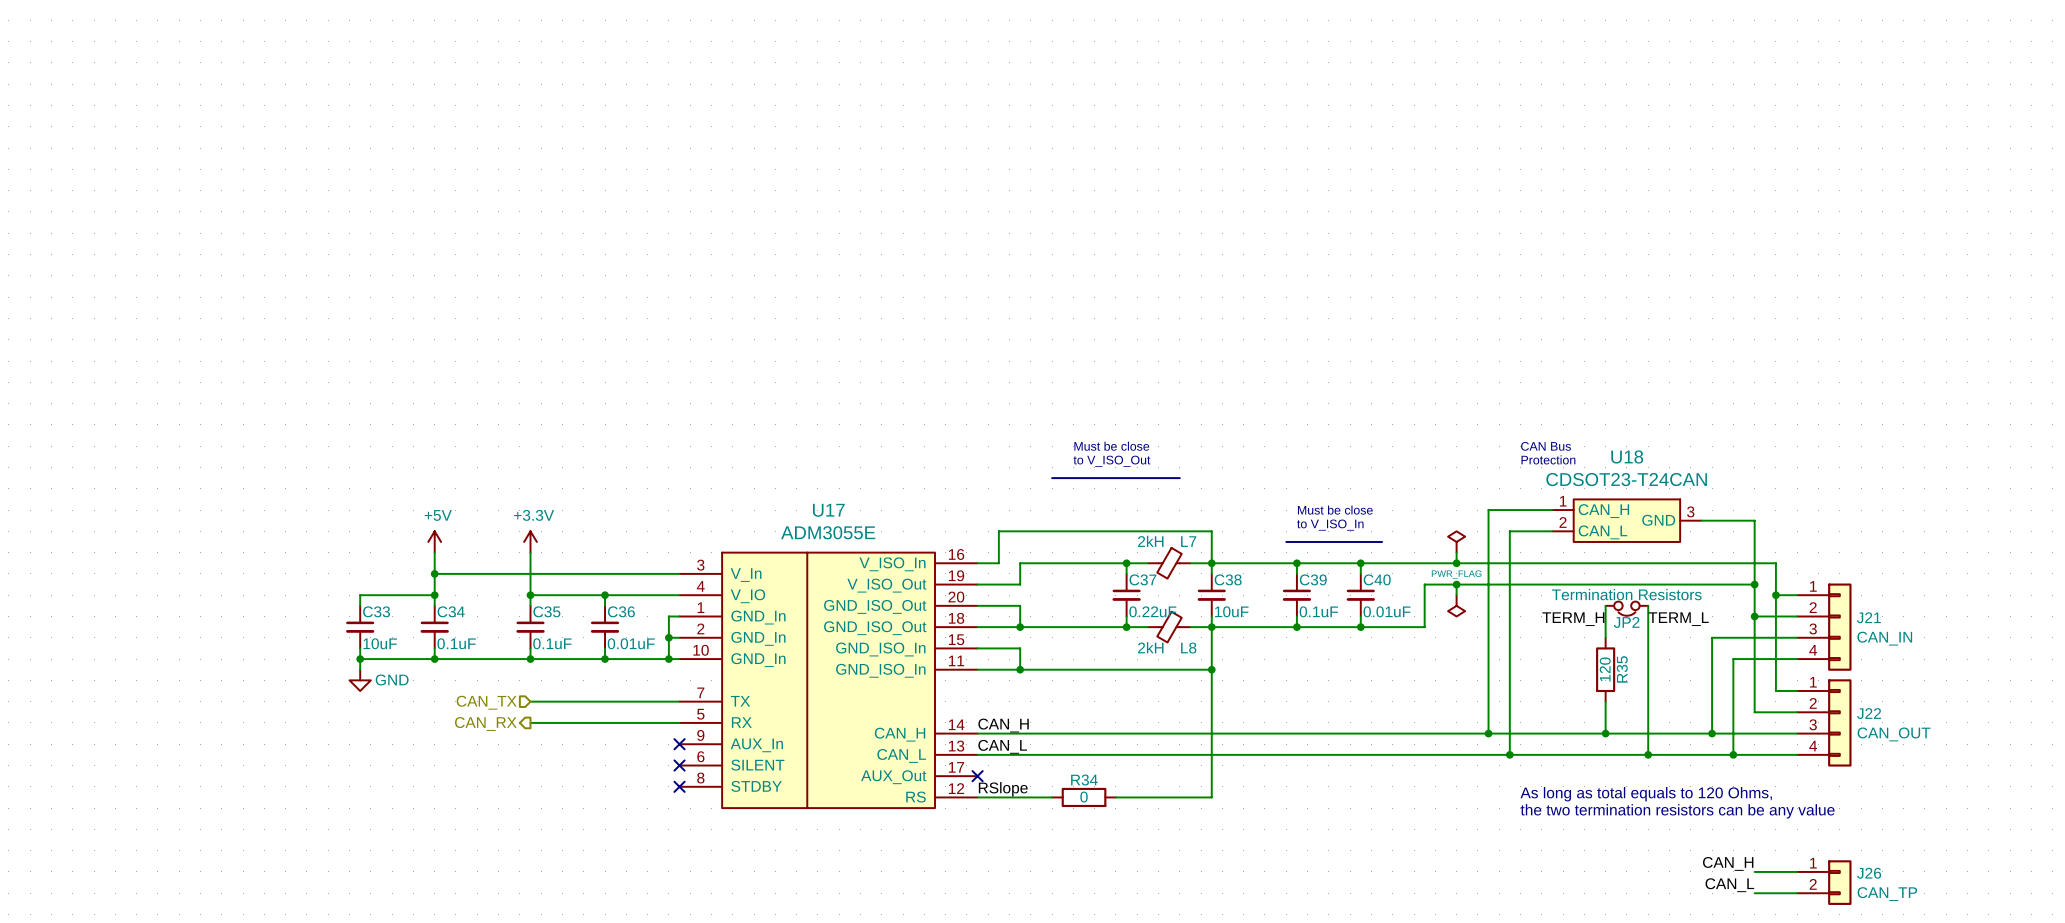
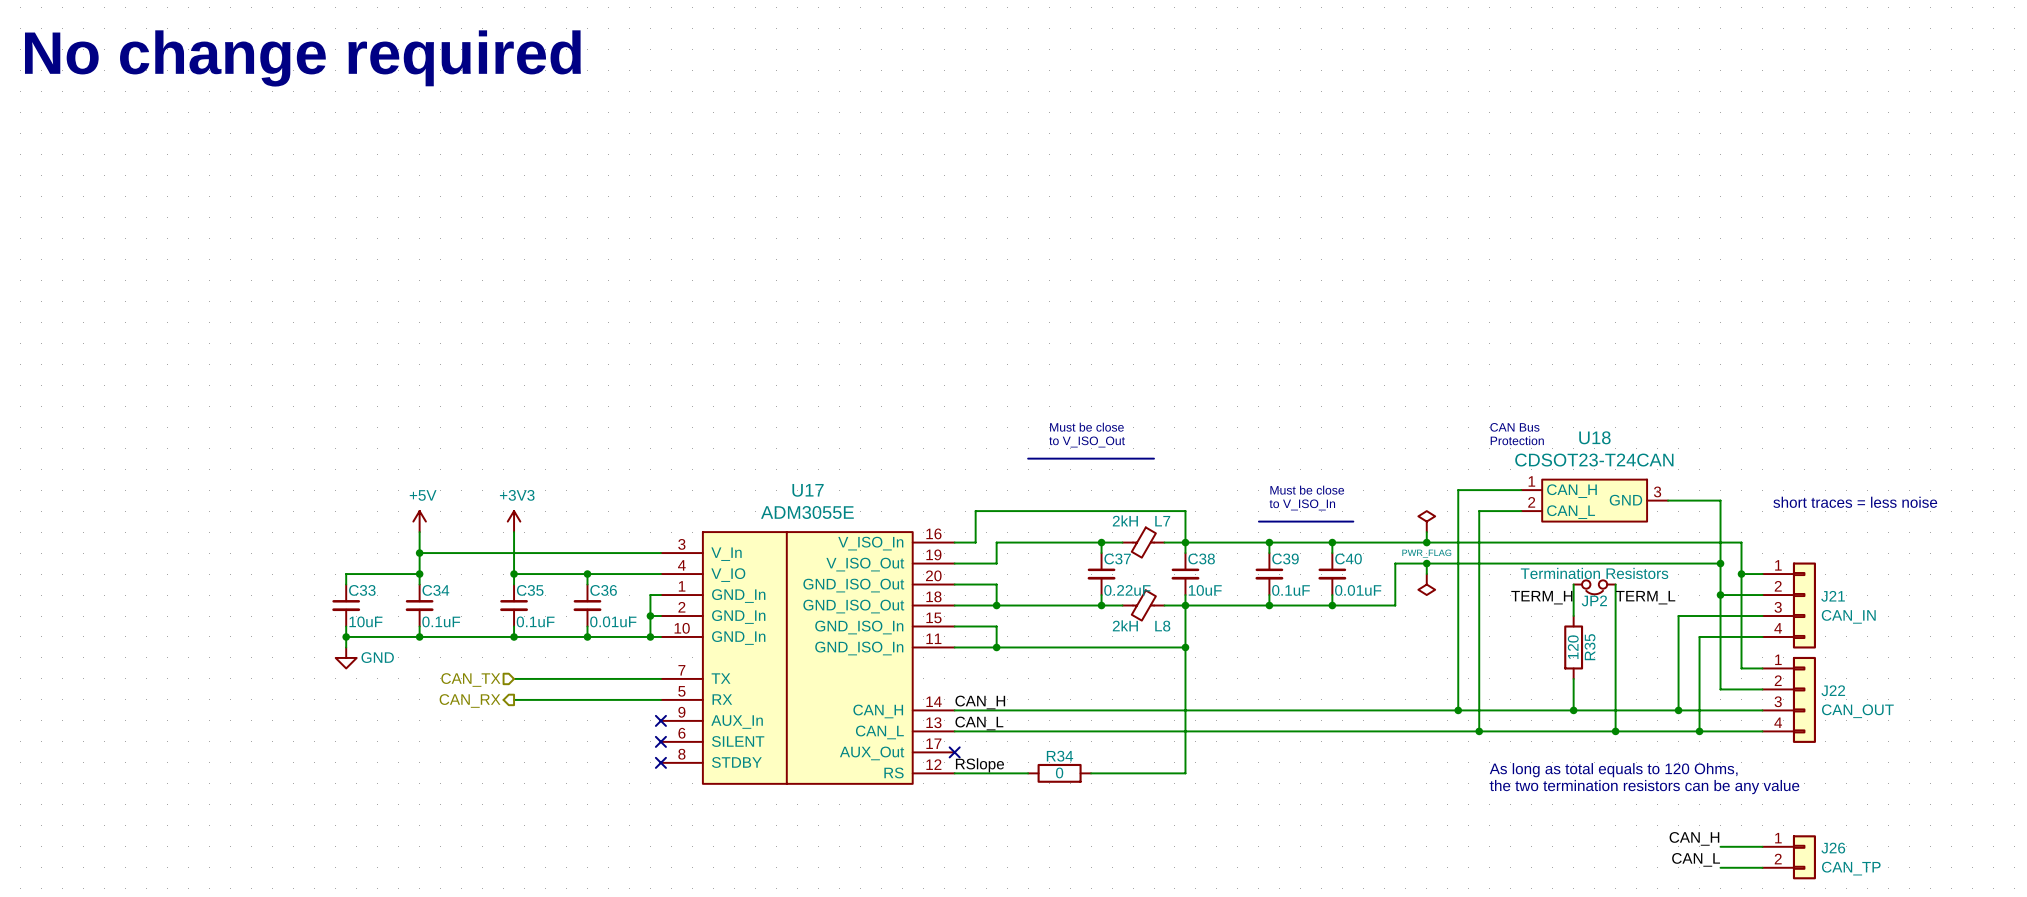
text: none -> No change required (302, 58)
text: none -> short traces = less noise (1855, 502)
power symbol: +3.3V (530, 541) -> +3V3 (514, 521)

